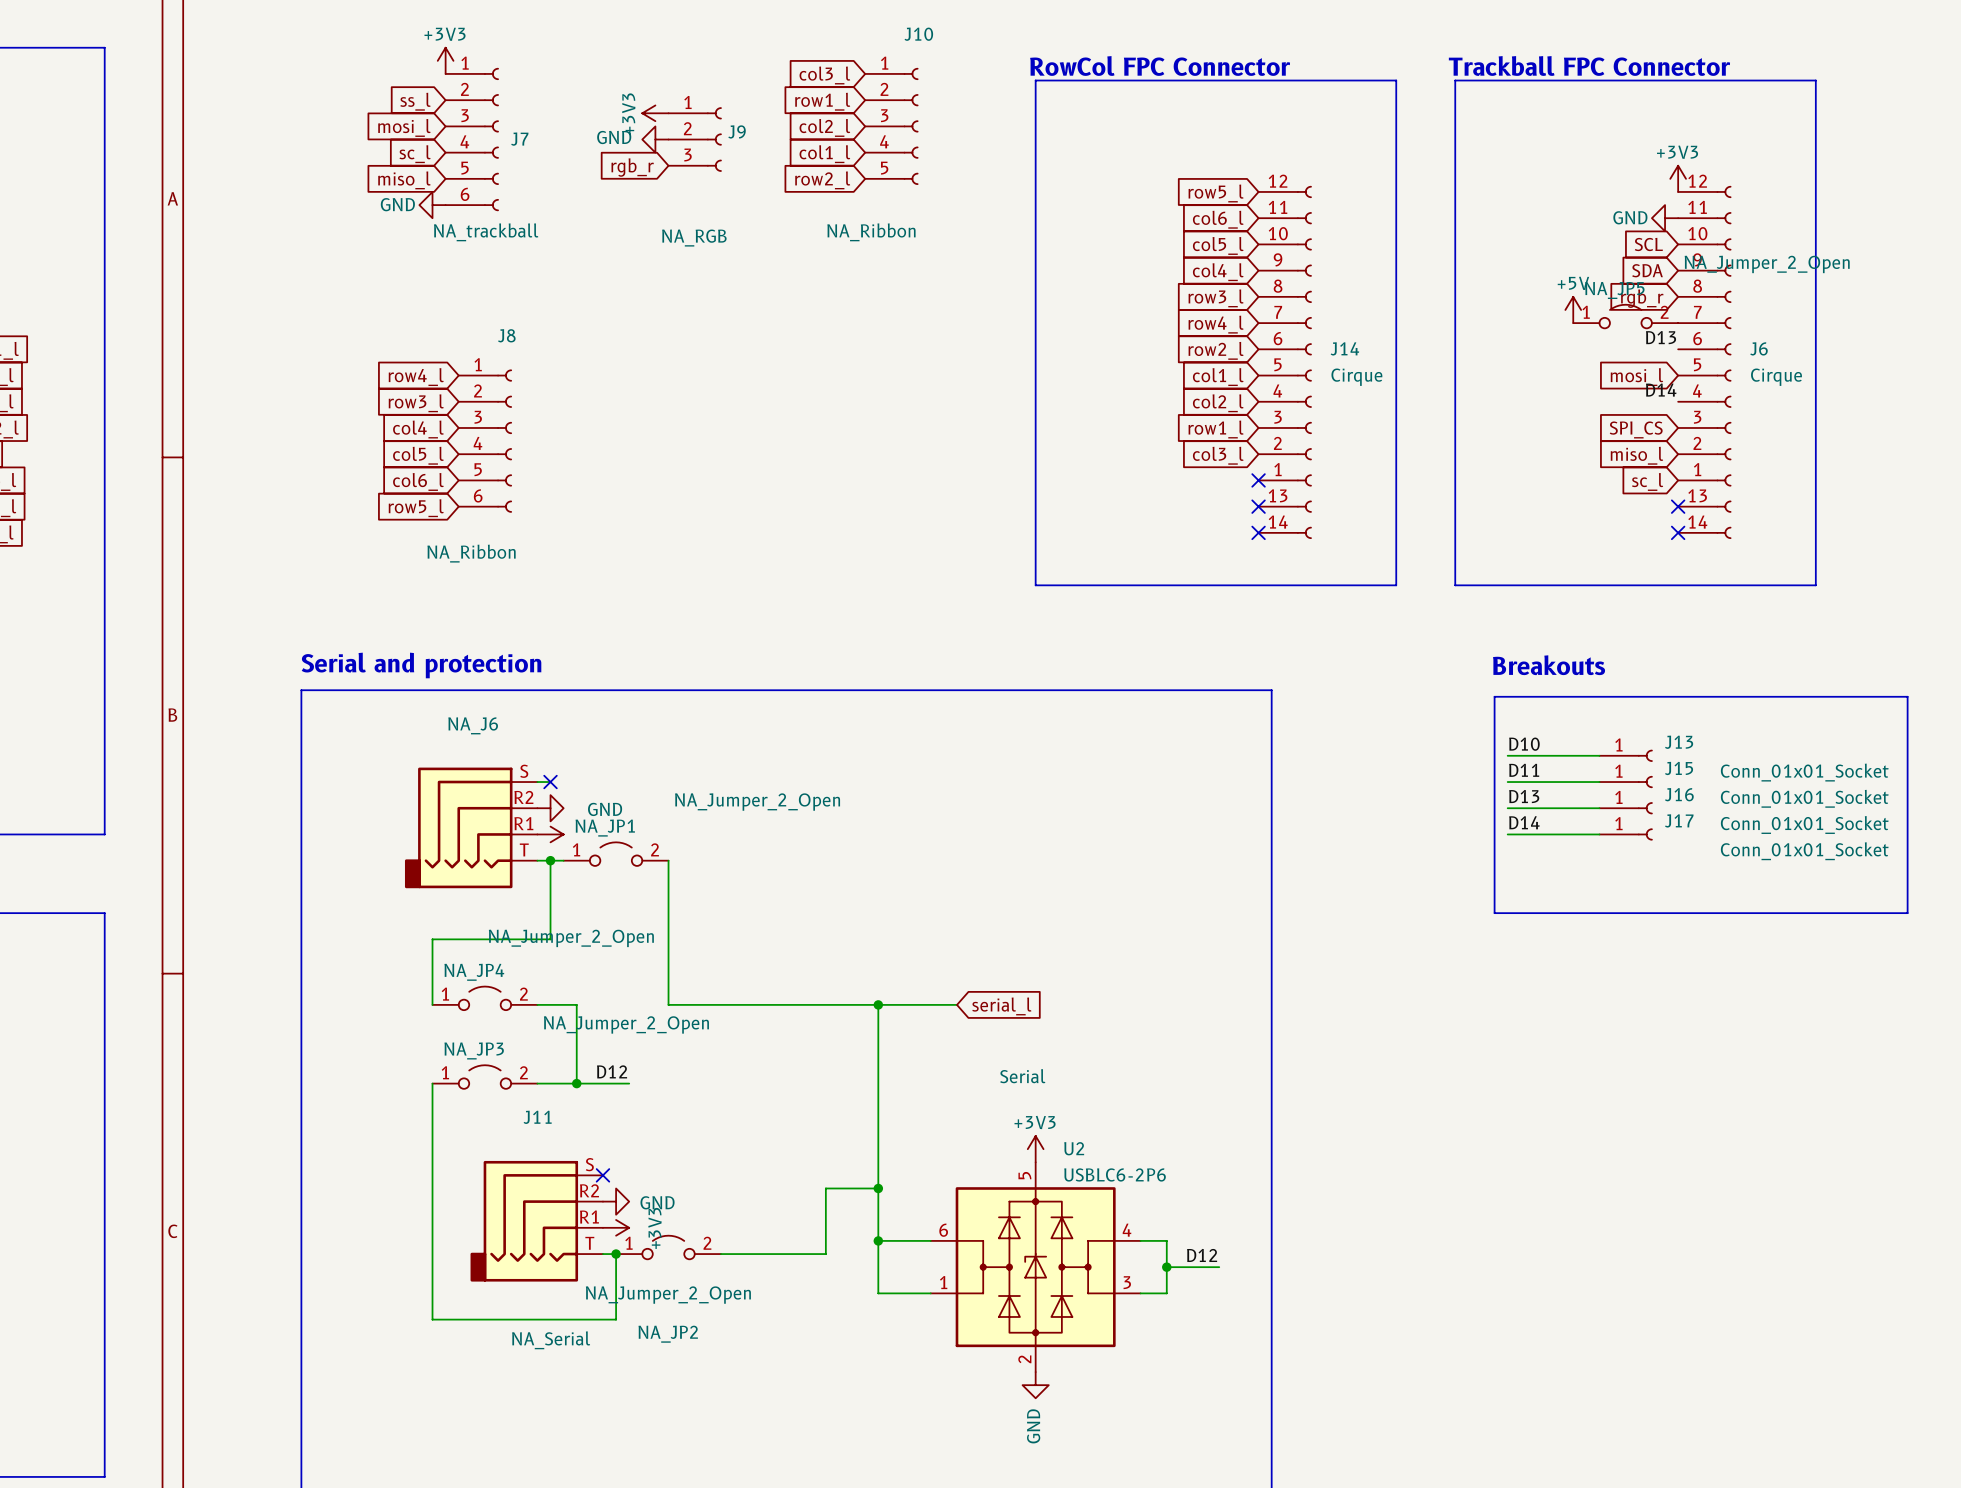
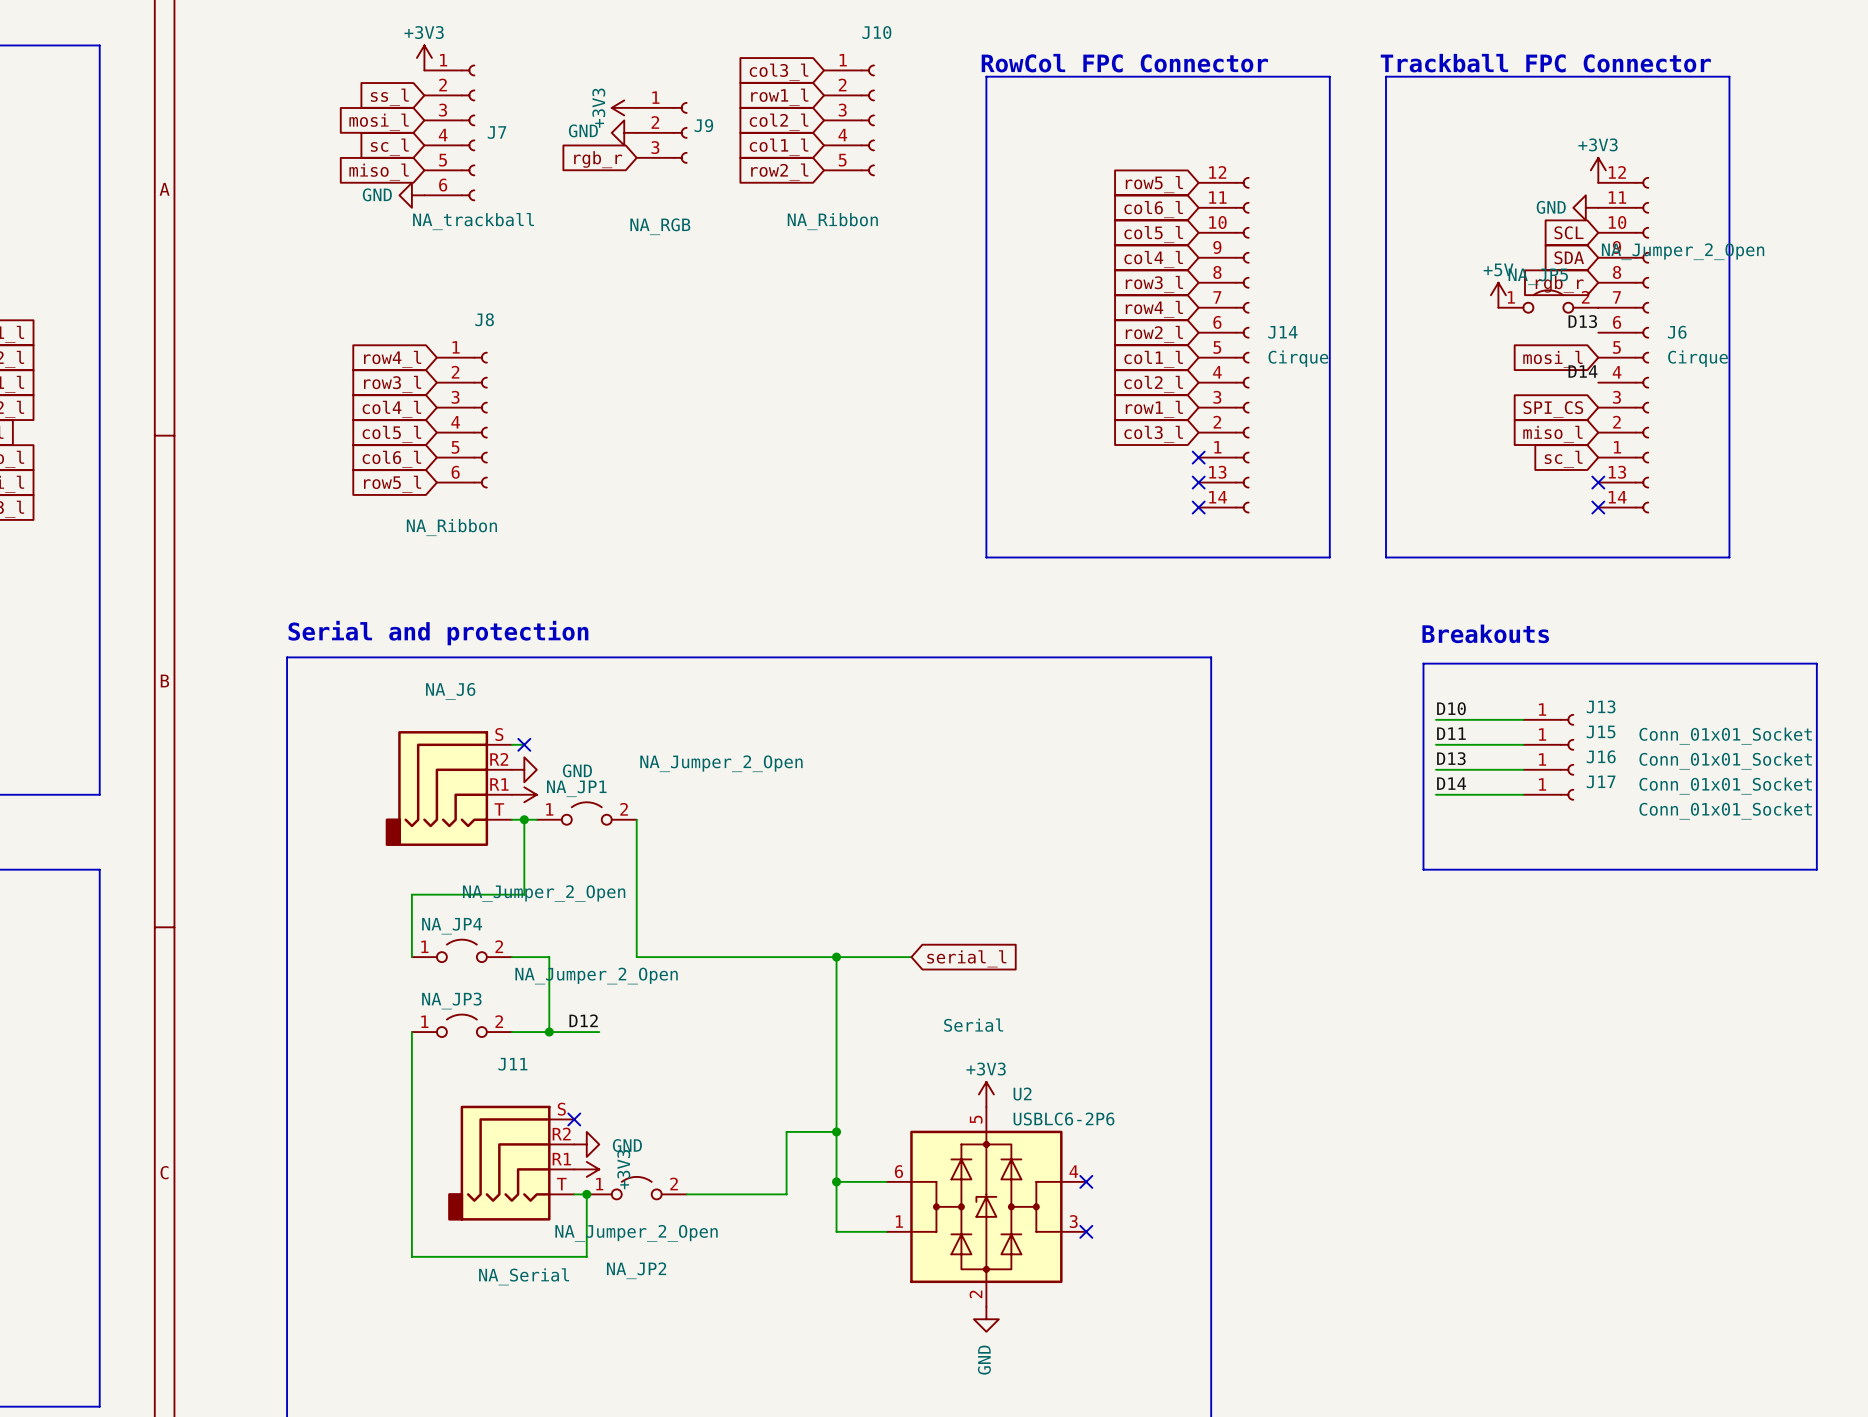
wire: (1140, 1240) (1166, 1240) (1166, 1293) (1140, 1293) -> none
no-connect mark: none -> (1086, 1181)
label: D12 (1202, 1255) -> none
wire: (1166, 1267) (1219, 1267) -> none
junction: (1166, 1267) -> none
no-connect mark: none -> (1086, 1231)

